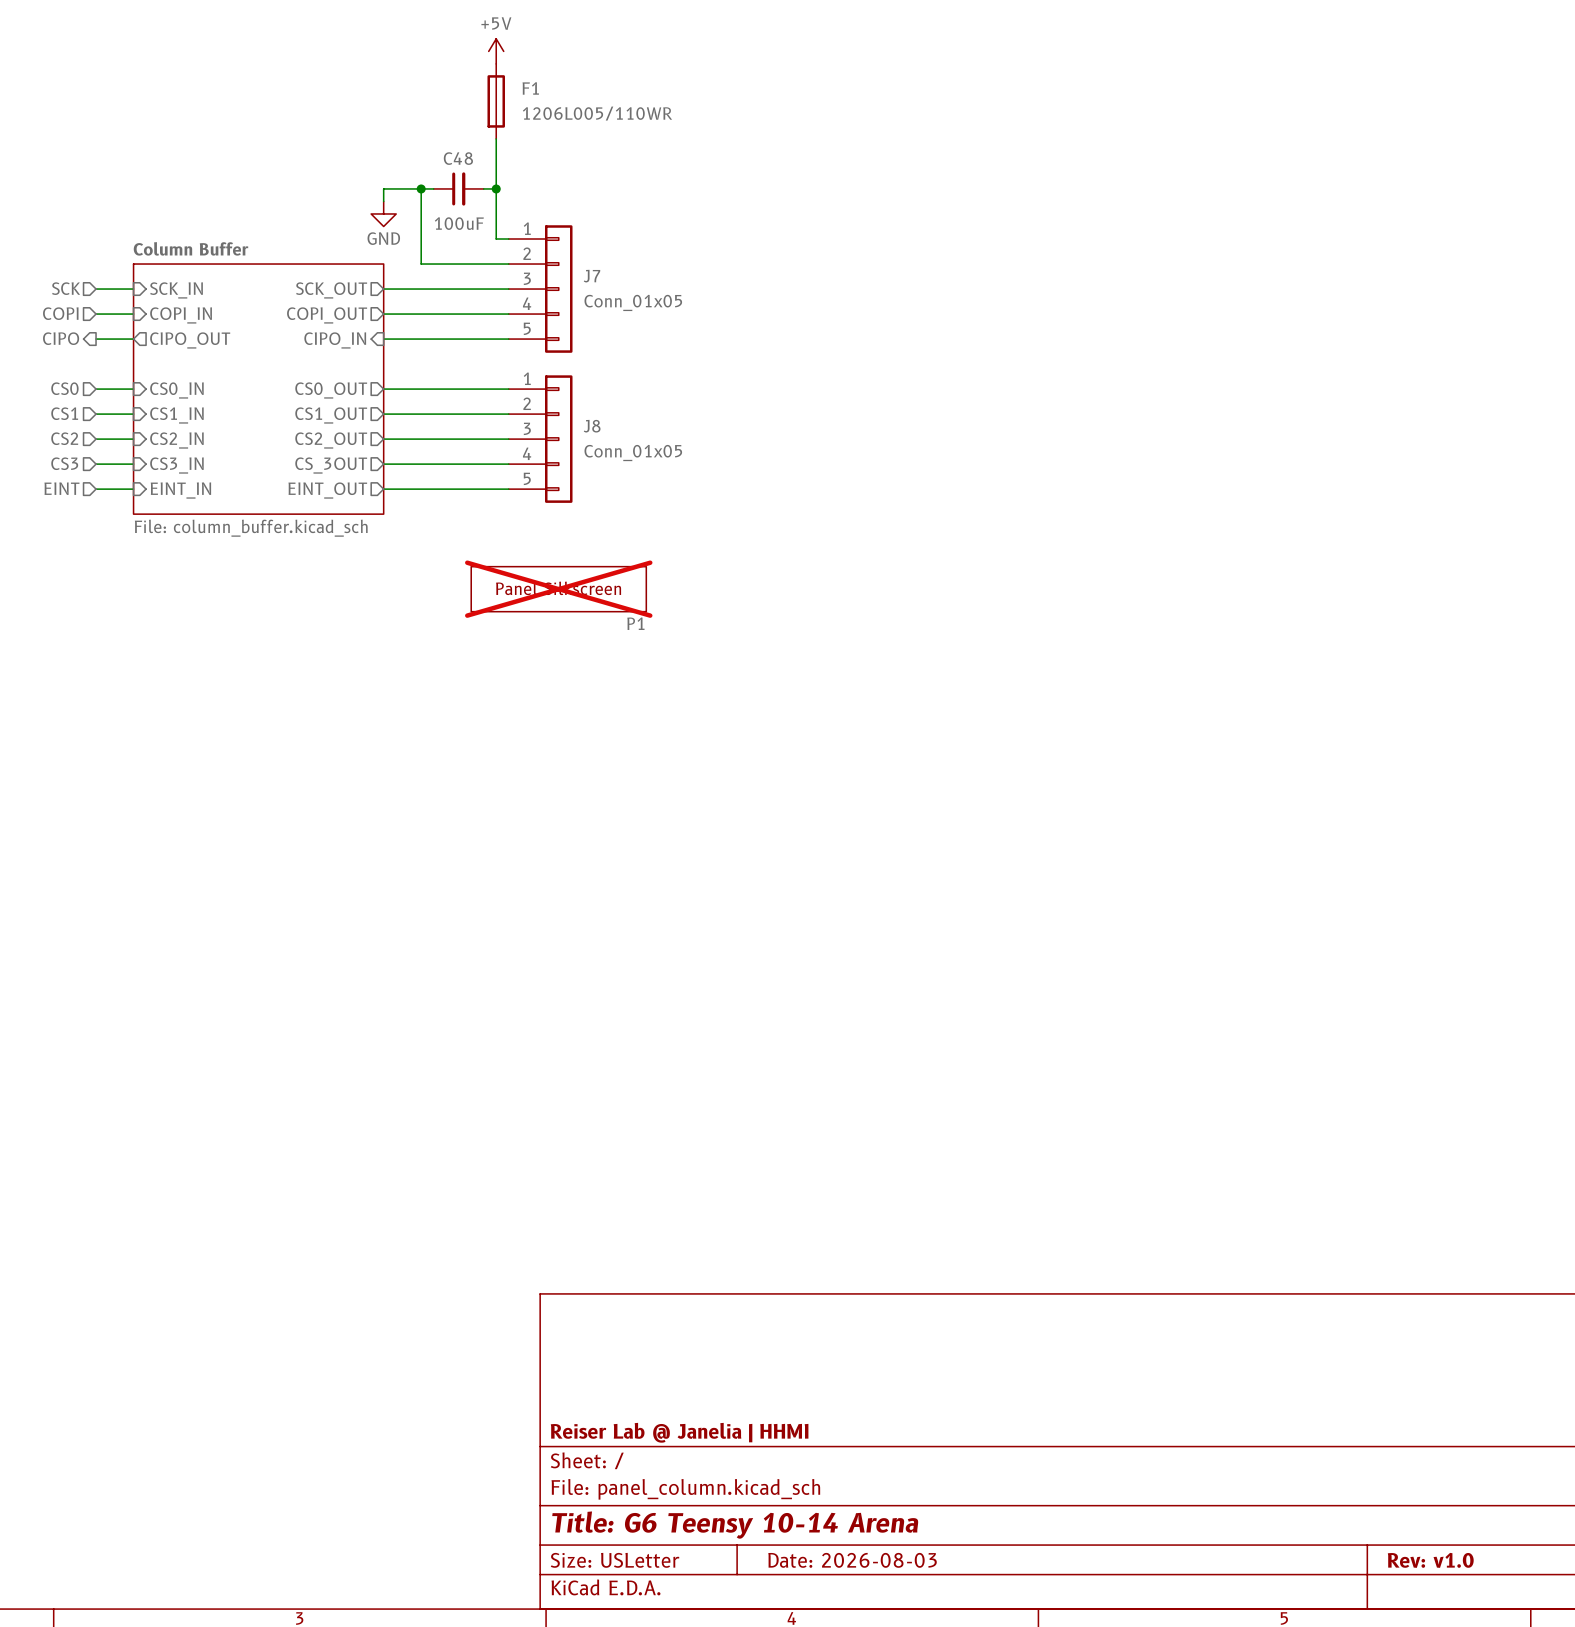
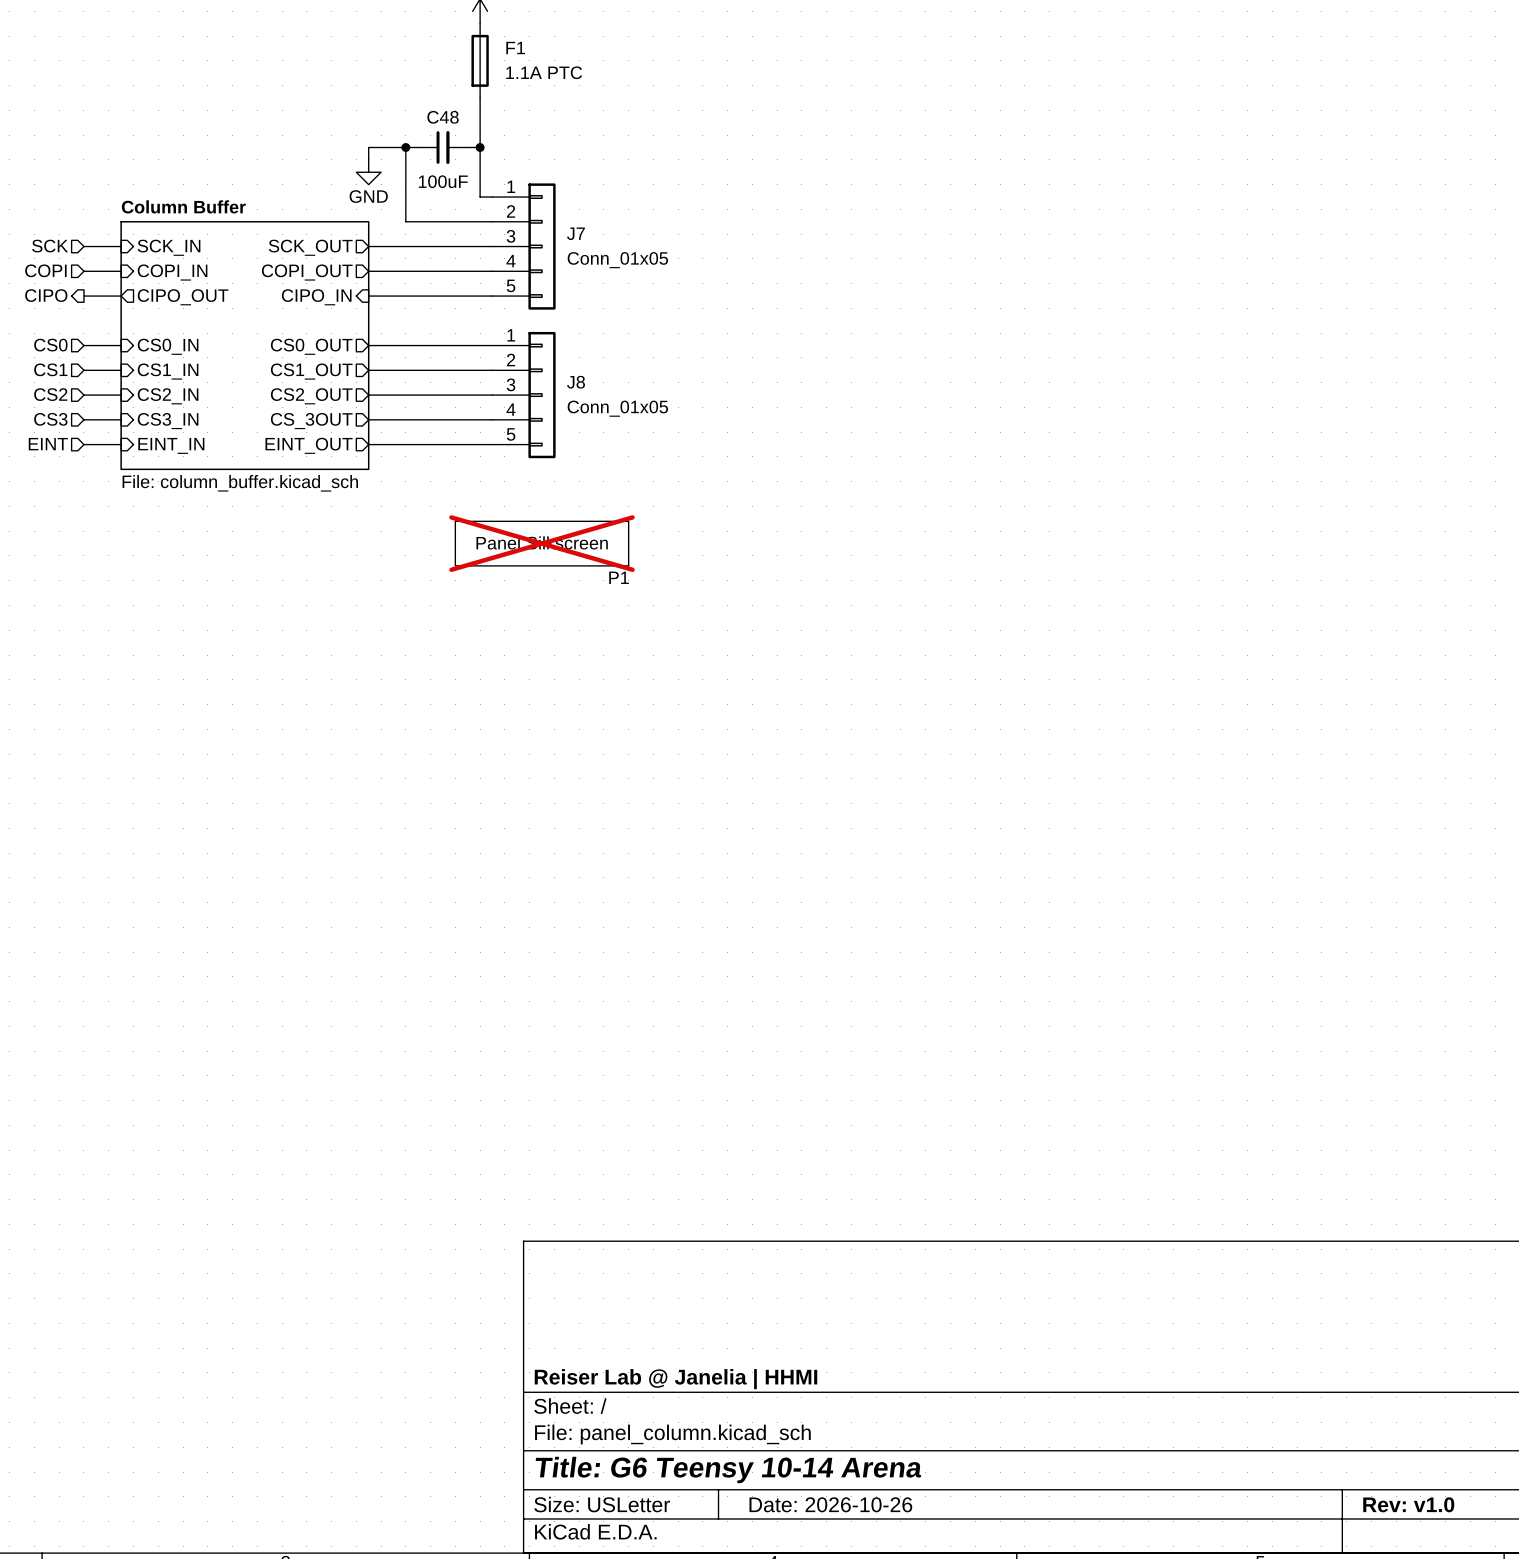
F1 value: 1206L005/110WR (597, 113) -> 1.1A PTC (544, 72)
title block: Date: 2026-08-03 (852, 1560) -> Date: 2026-10-26 (830, 1504)

